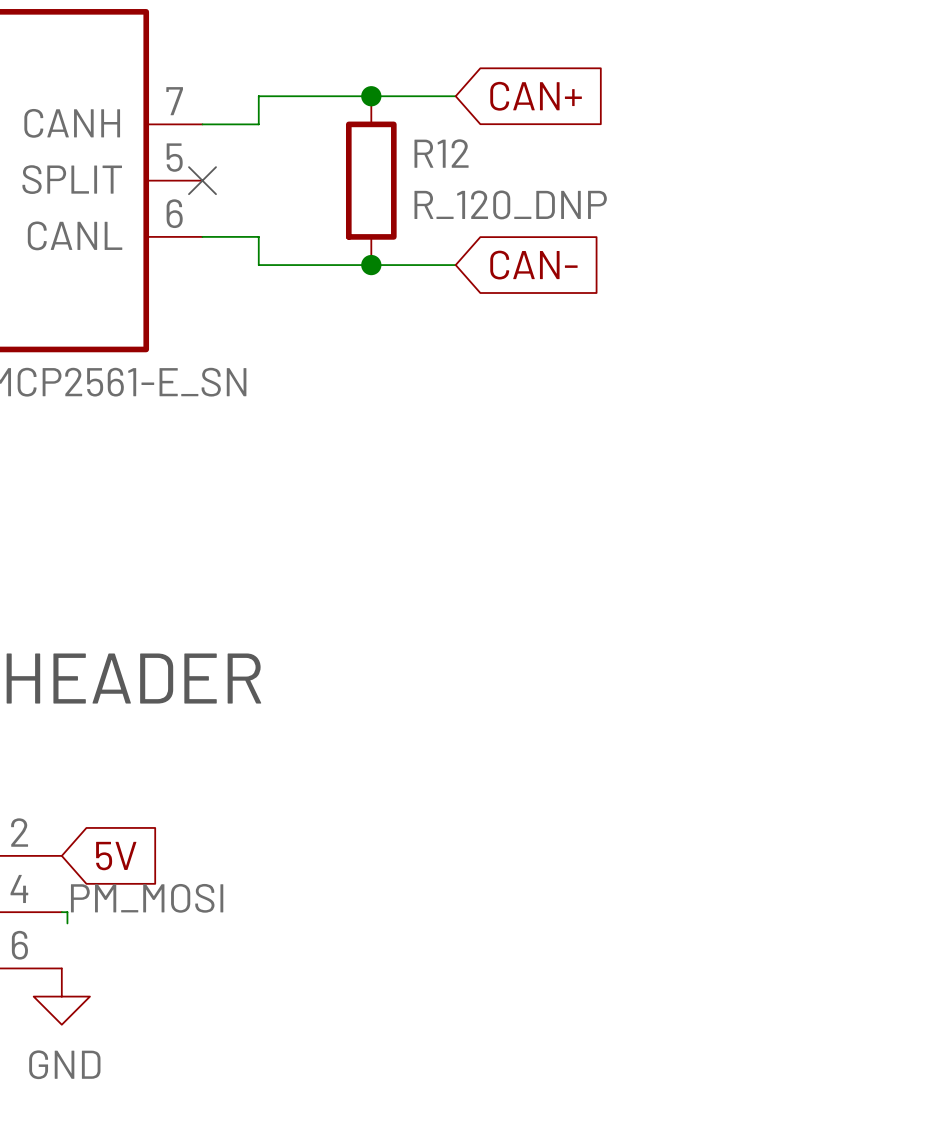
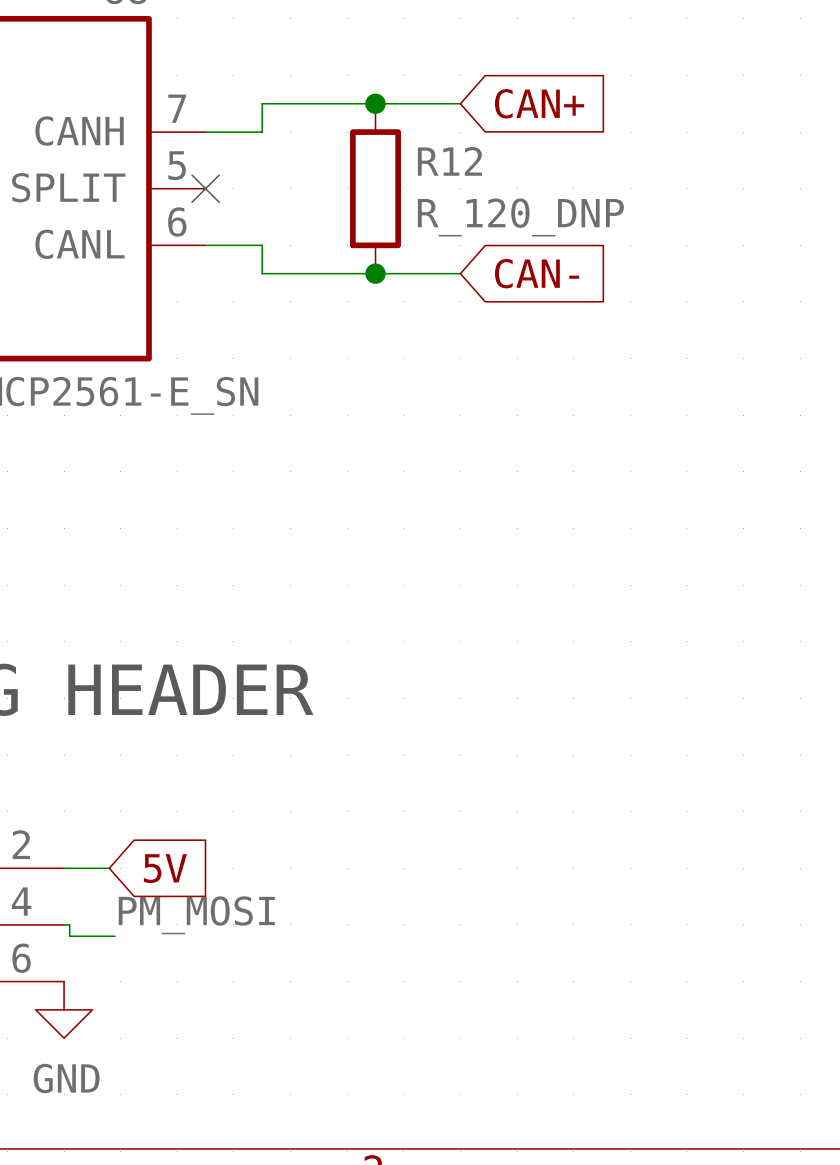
wire: none -> (64, 868) (109, 868)
global label position: 5V (116, 856) -> 5V (165, 868)
label position: PM_MOSI (147, 898) -> PM_MOSI (196, 915)
wire: none -> (69, 936) (115, 936)

